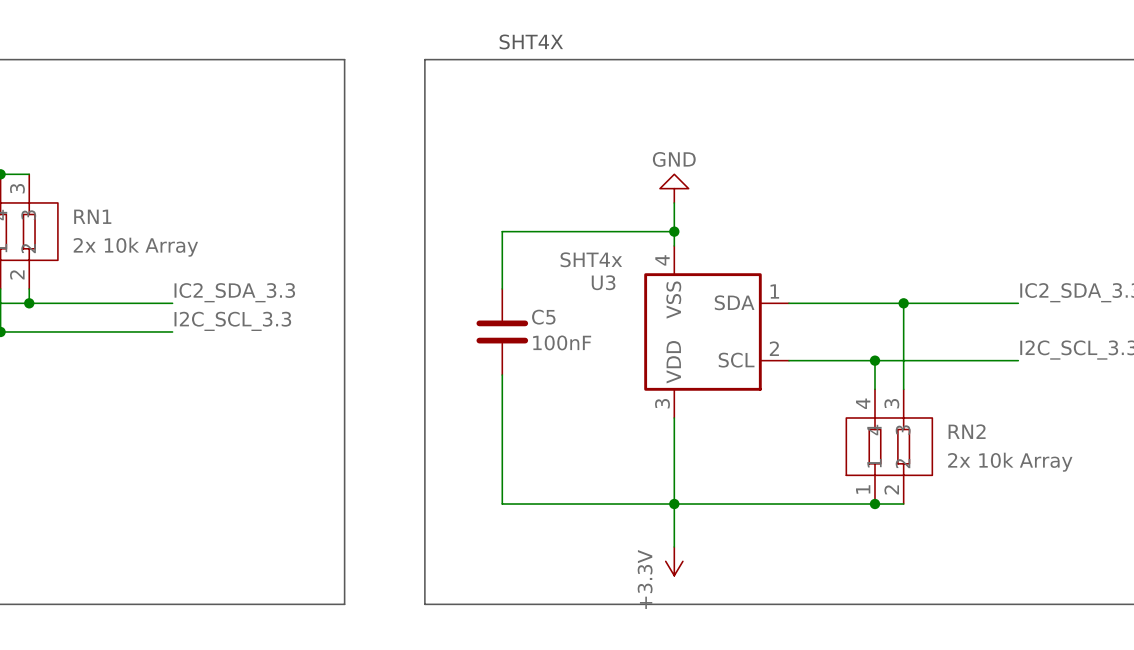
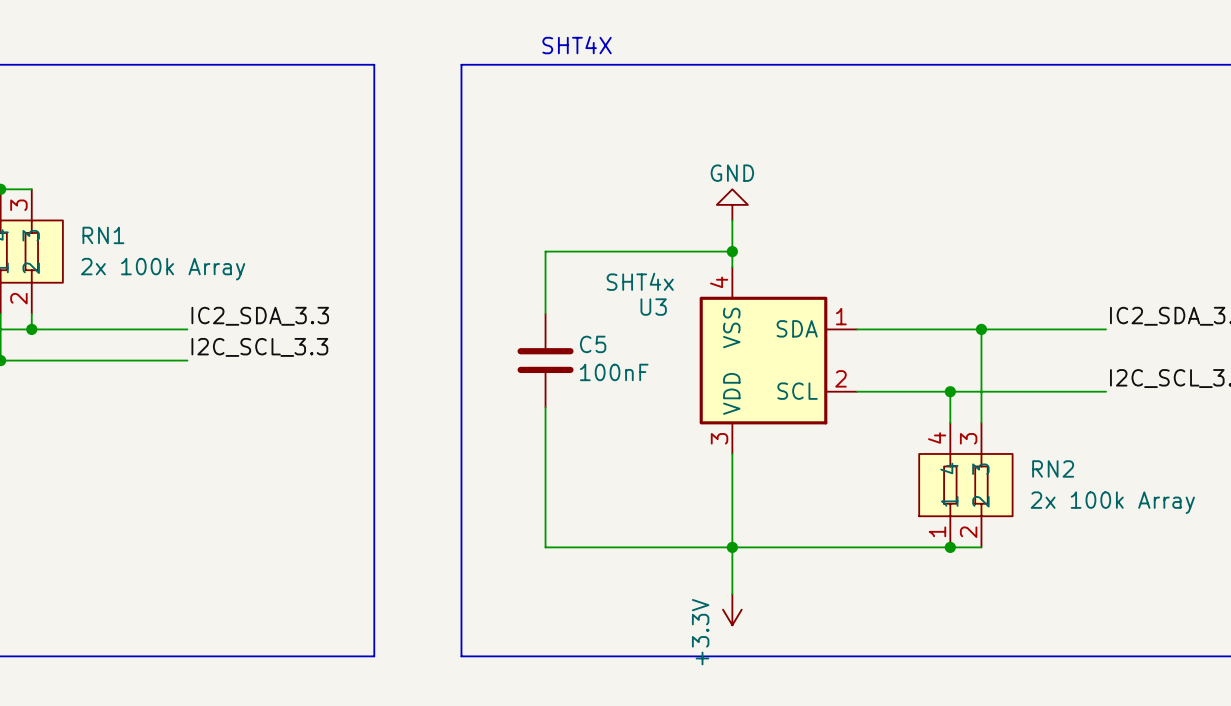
RN1 value: 2x 10k Array (135, 247) -> 2x 100k Array (163, 269)
RN2 value: 2x 10k Array (1010, 462) -> 2x 100k Array (1112, 502)

